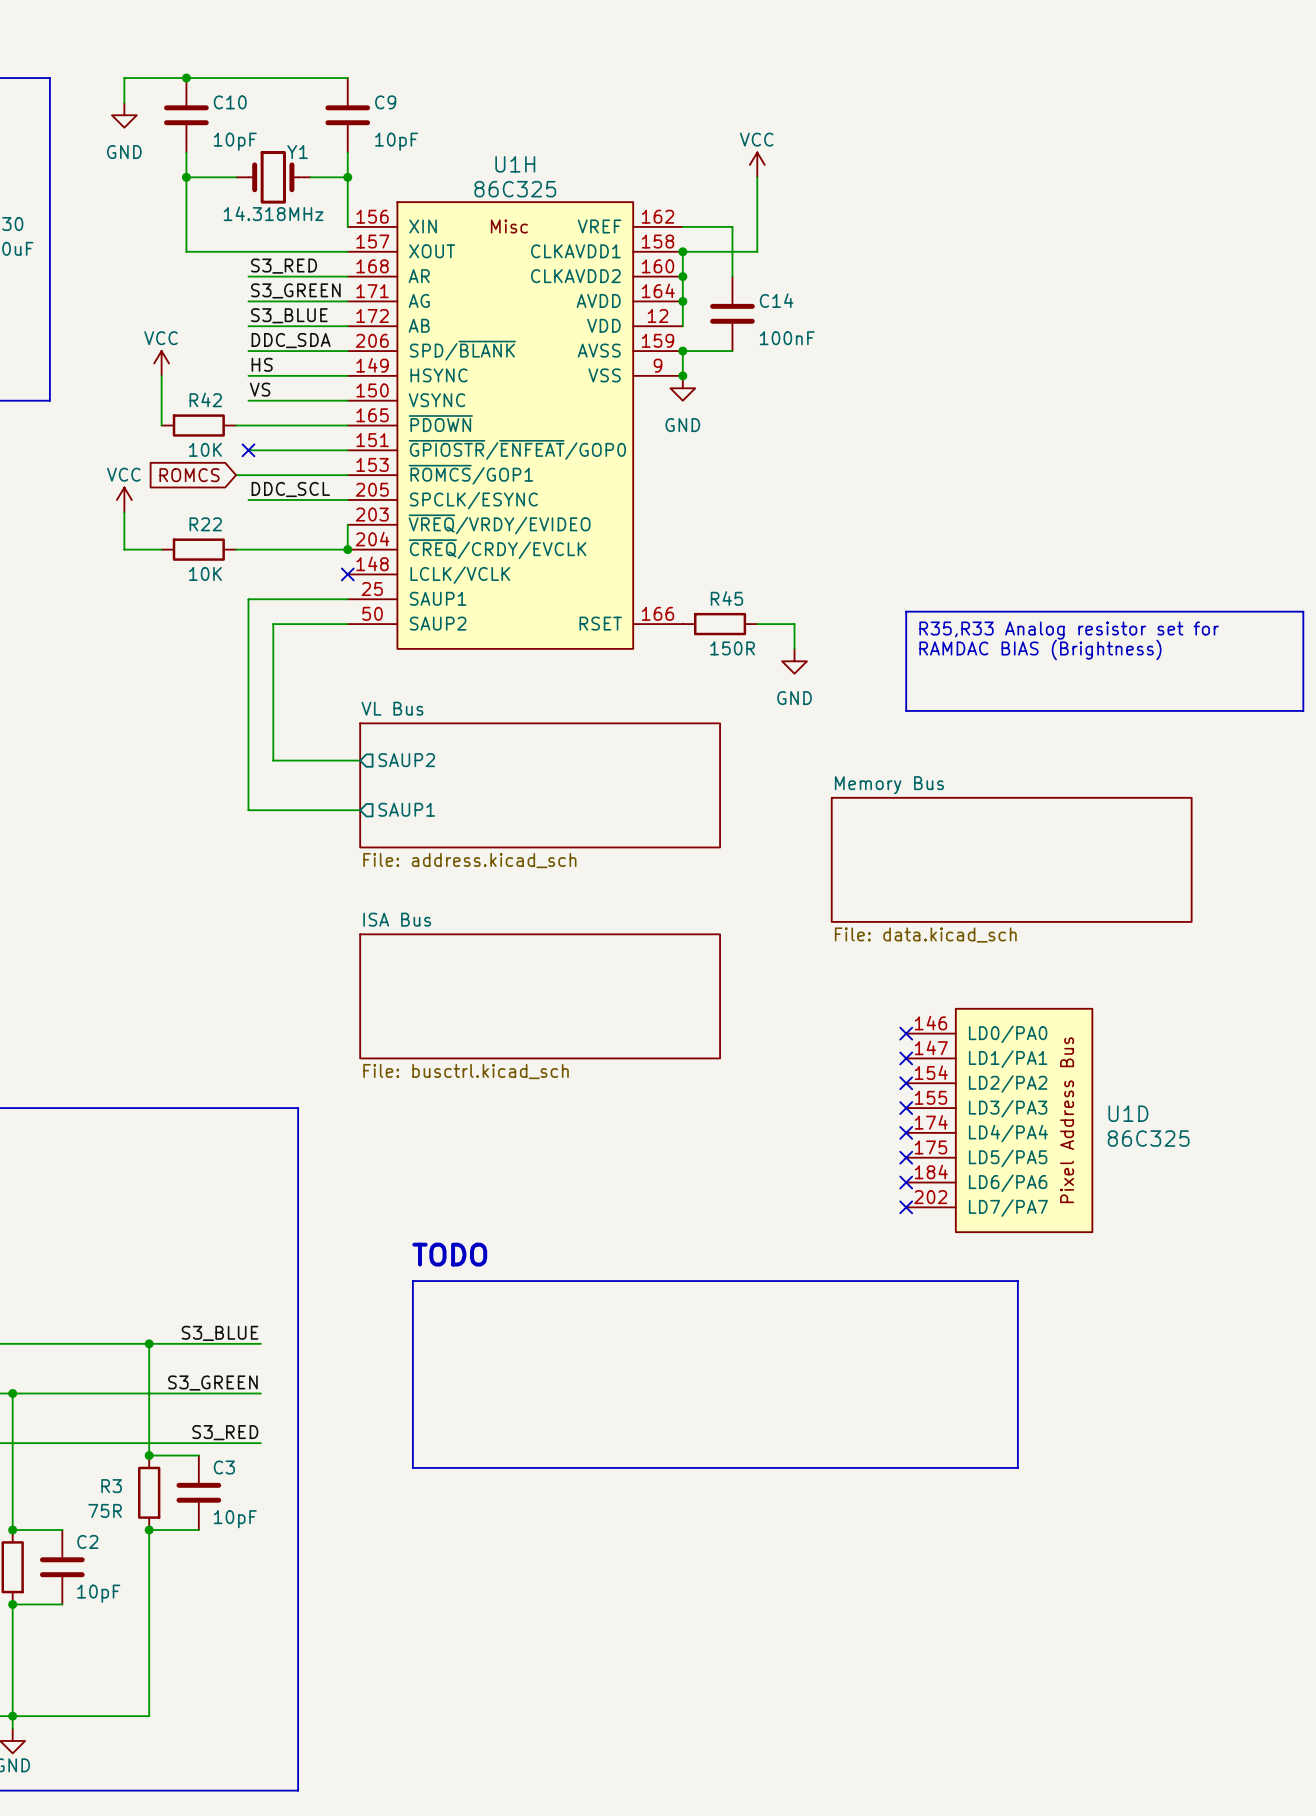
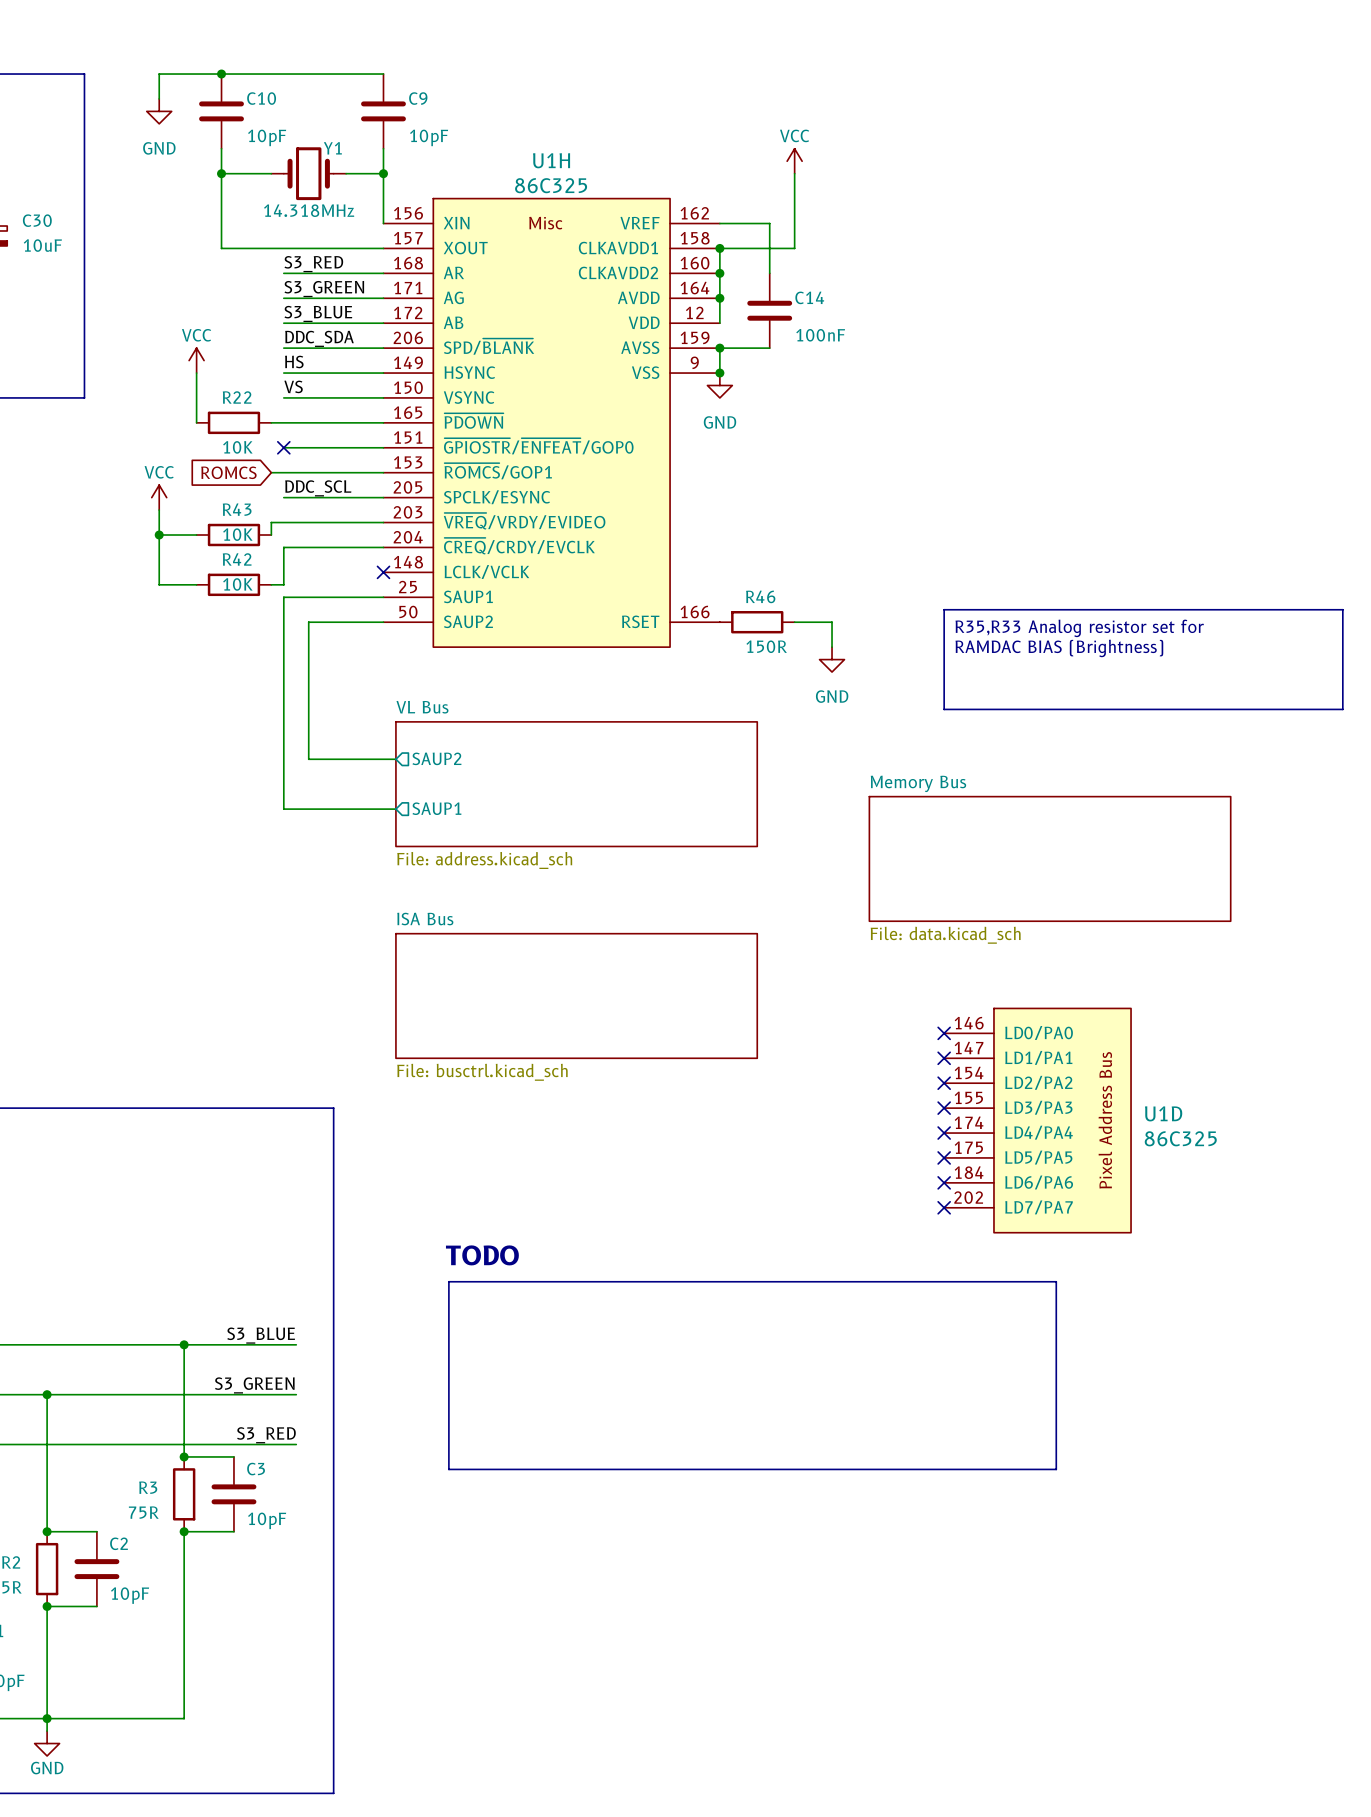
R42 name: R42 (205, 399) -> R22 (237, 397)
wire: (347, 524) (347, 549) -> (383, 522) (271, 522) (271, 535)
wire: none -> (159, 535) (196, 535)
junction: none -> (159, 535)
R43: none -> 10K (233, 535)
wire: (124, 549) (161, 549) -> (159, 547) (159, 584) (196, 584)
R22: 10K (198, 549) -> none
wire: (236, 549) (248, 549) -> (271, 584) (283, 584) (283, 547)
junction: (347, 549) -> none
R42: none -> 10K (233, 584)
R45 name: R45 (726, 598) -> R46 (760, 596)

